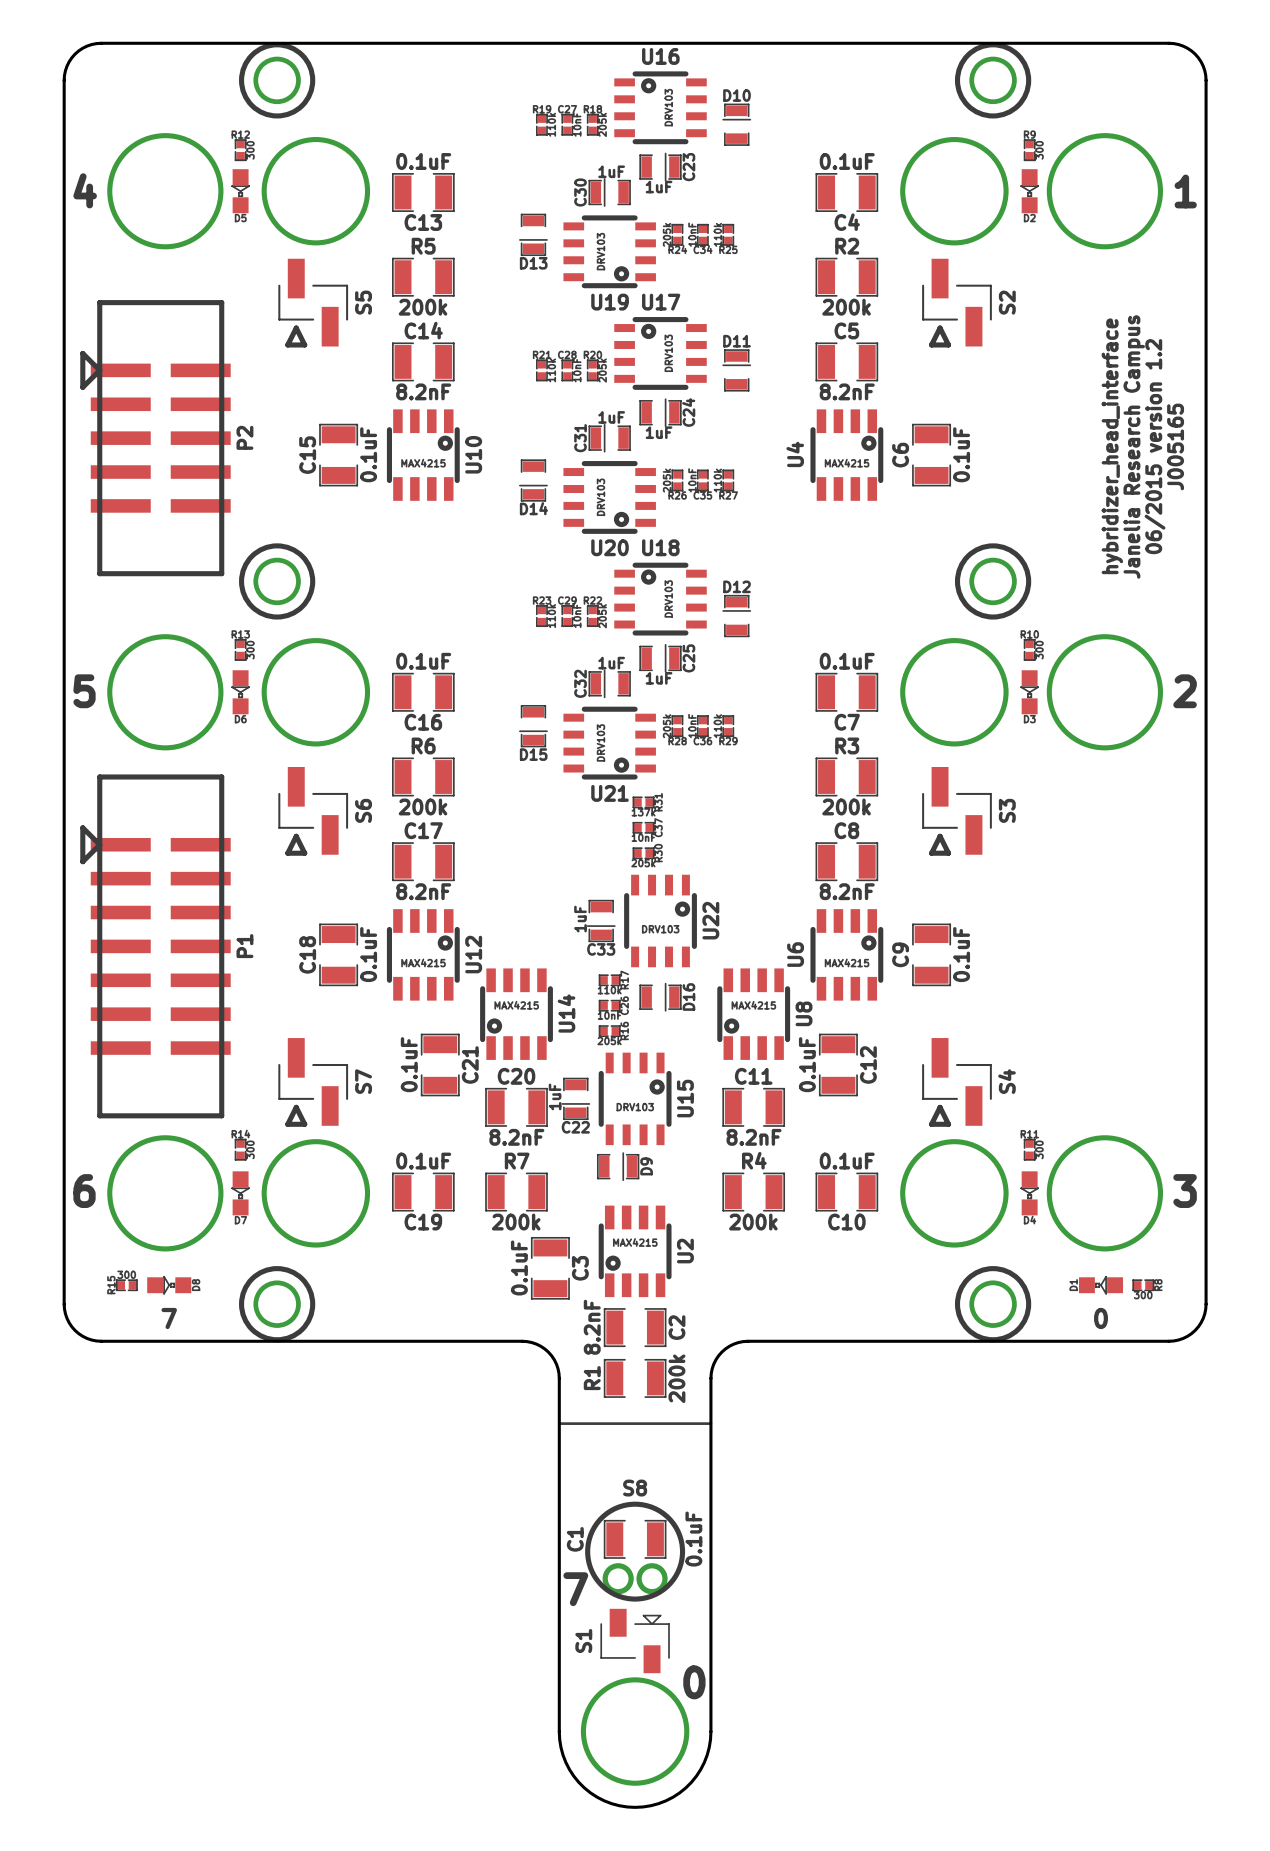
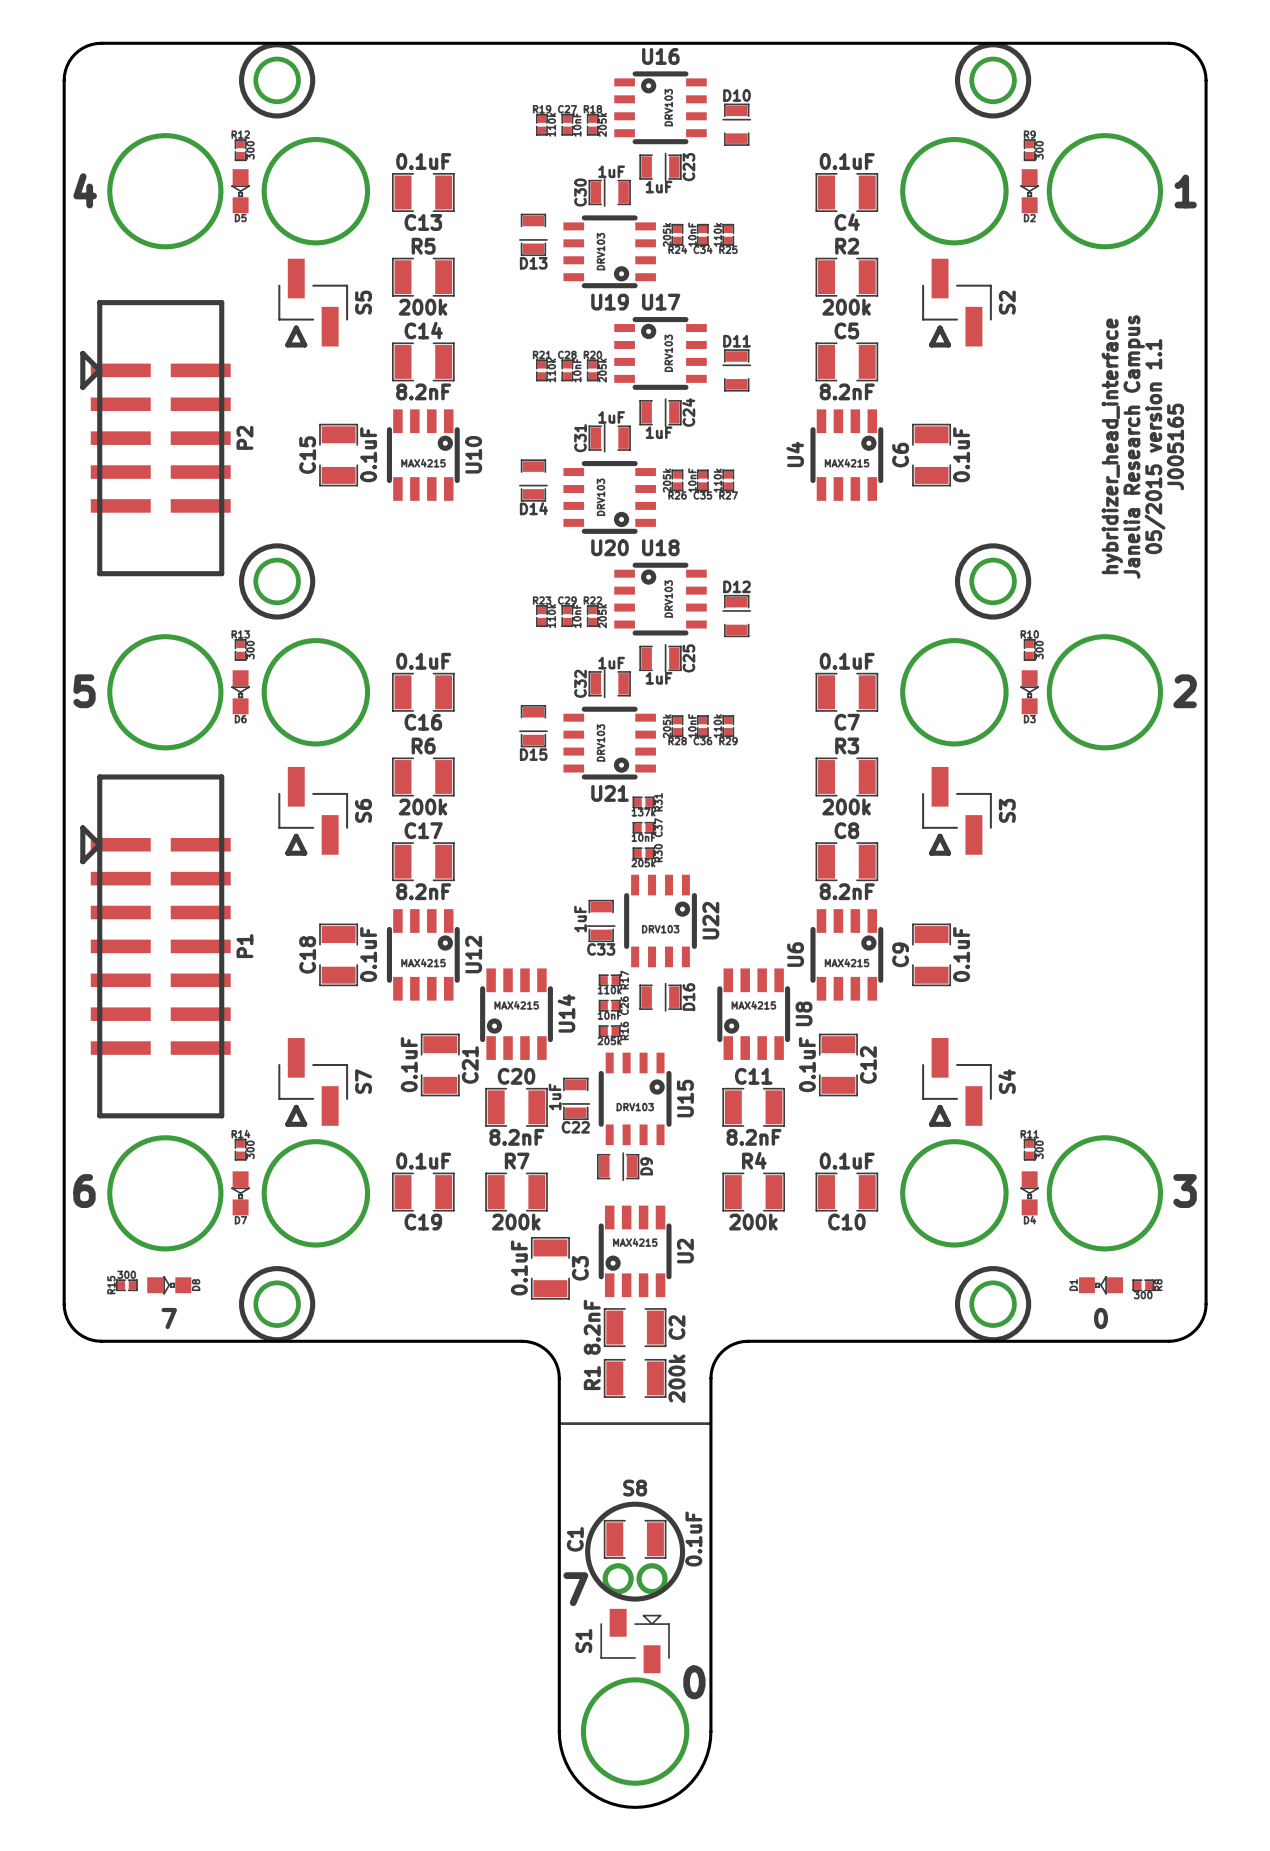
text: 06/2015 version 1.2 (1155, 446) -> 05/2015 version 1.1 (1155, 446)

